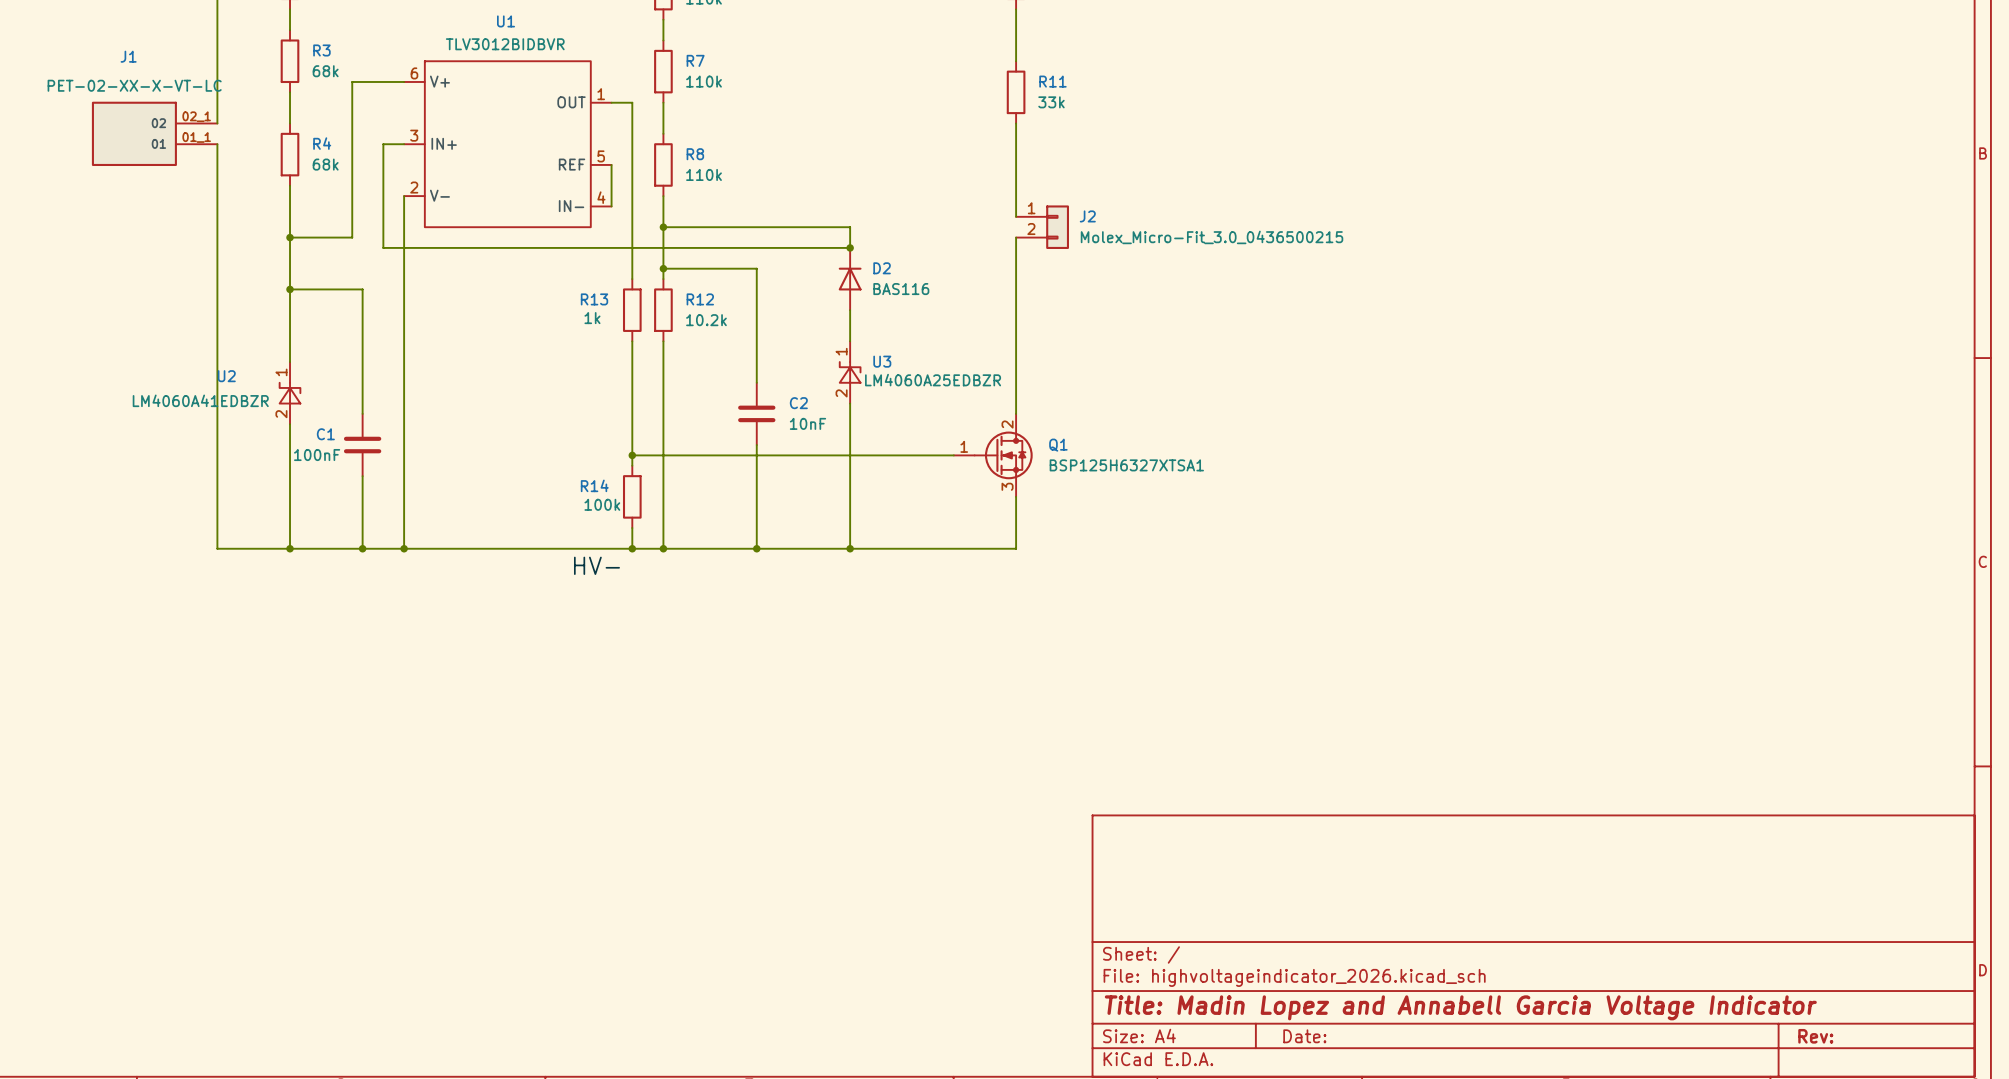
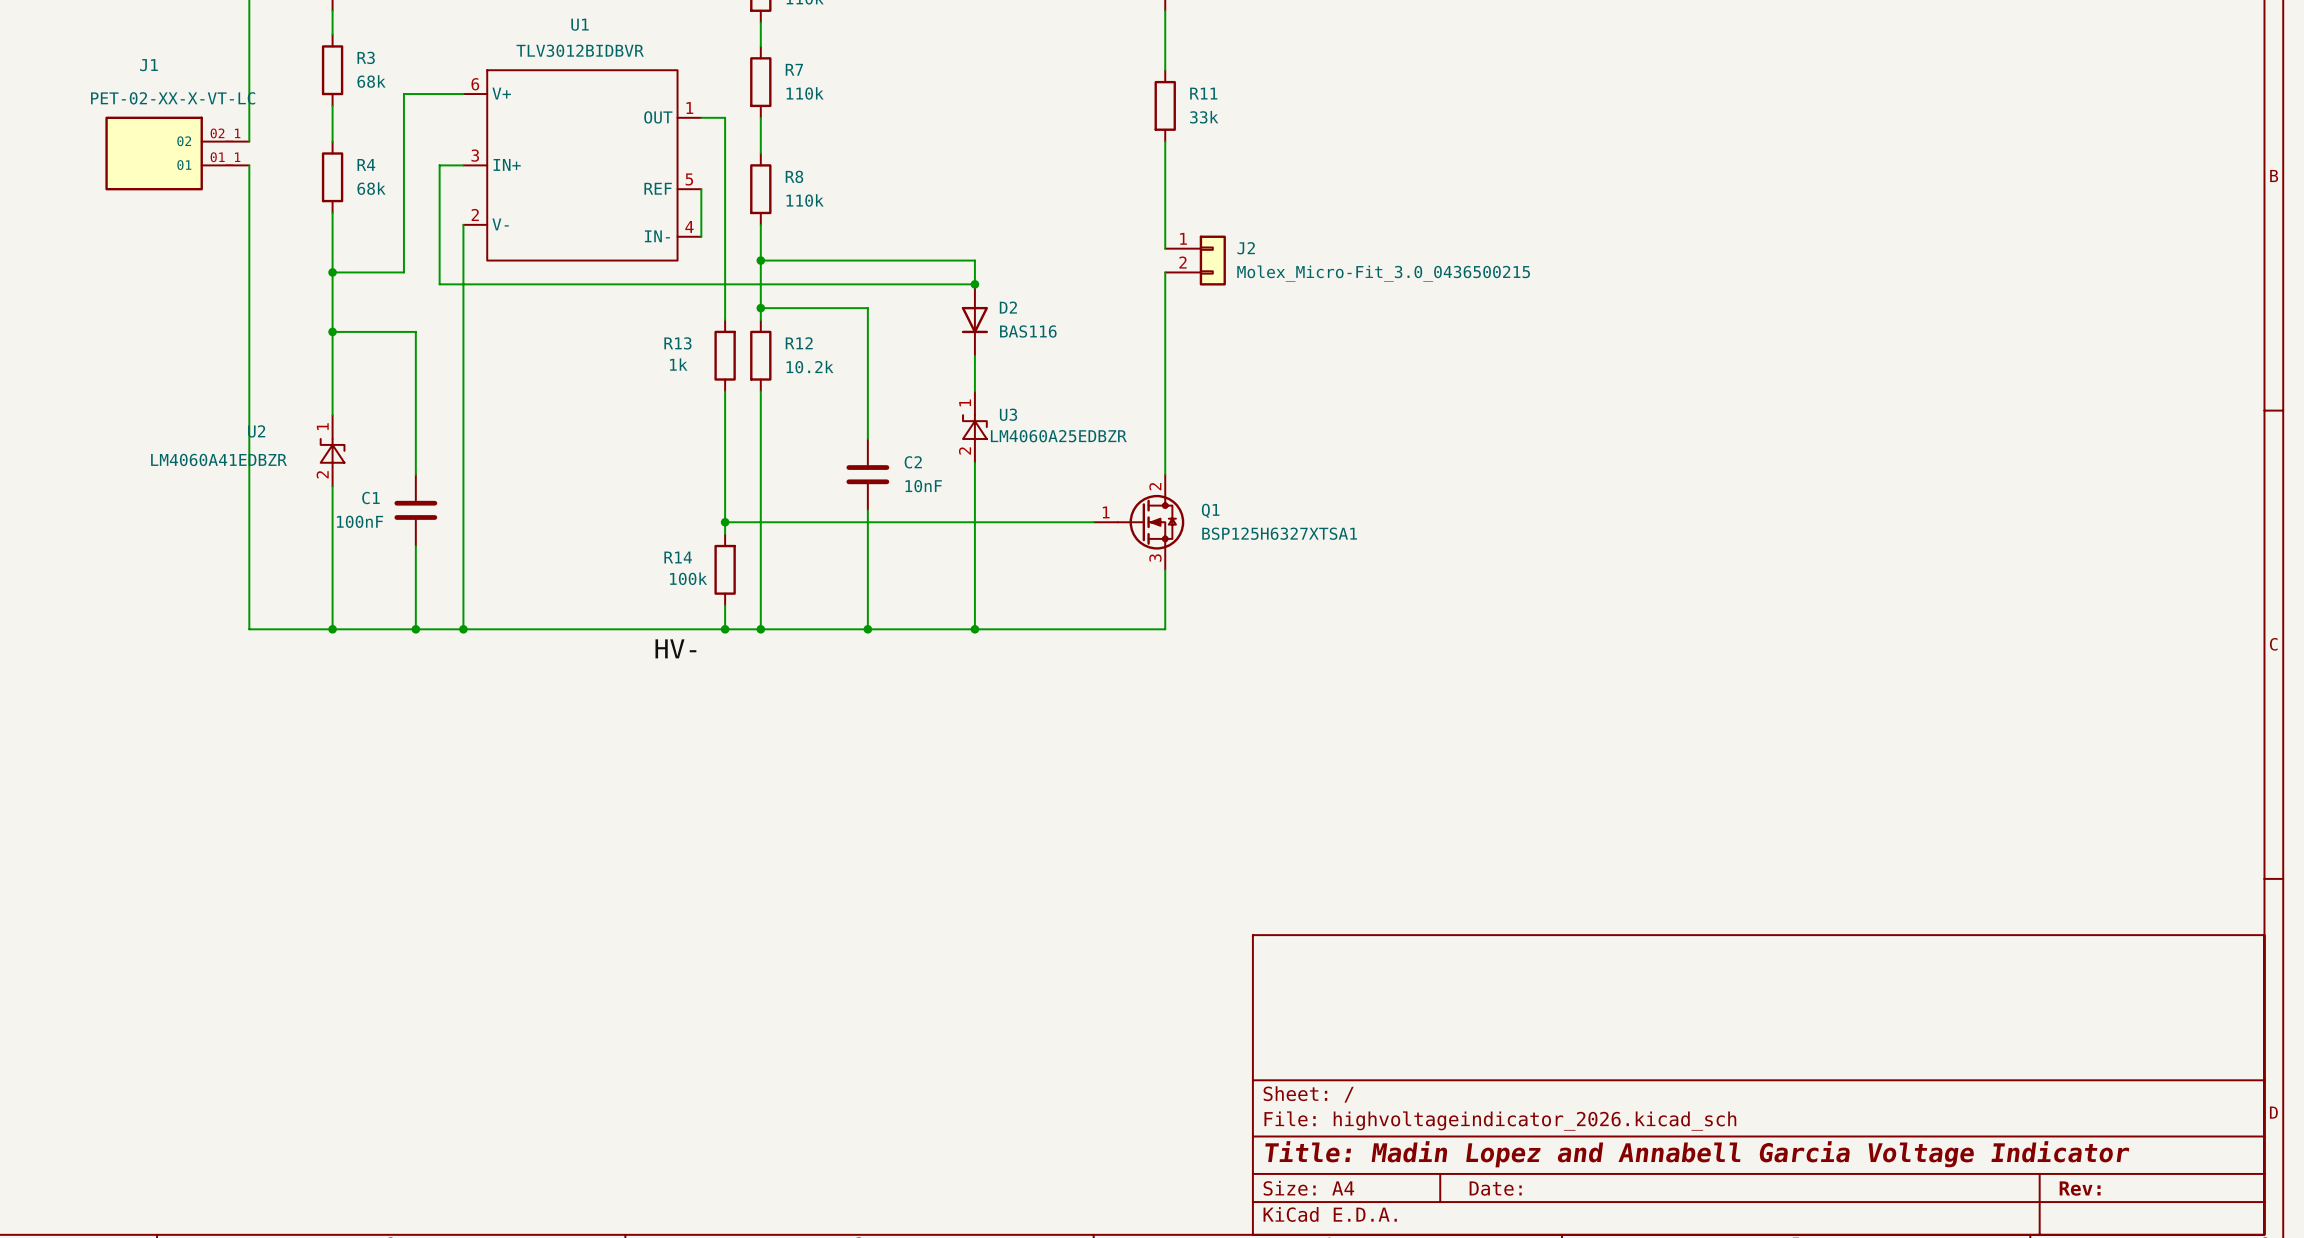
D2 rotation: 0° (850, 279) -> 180° (974, 320)

